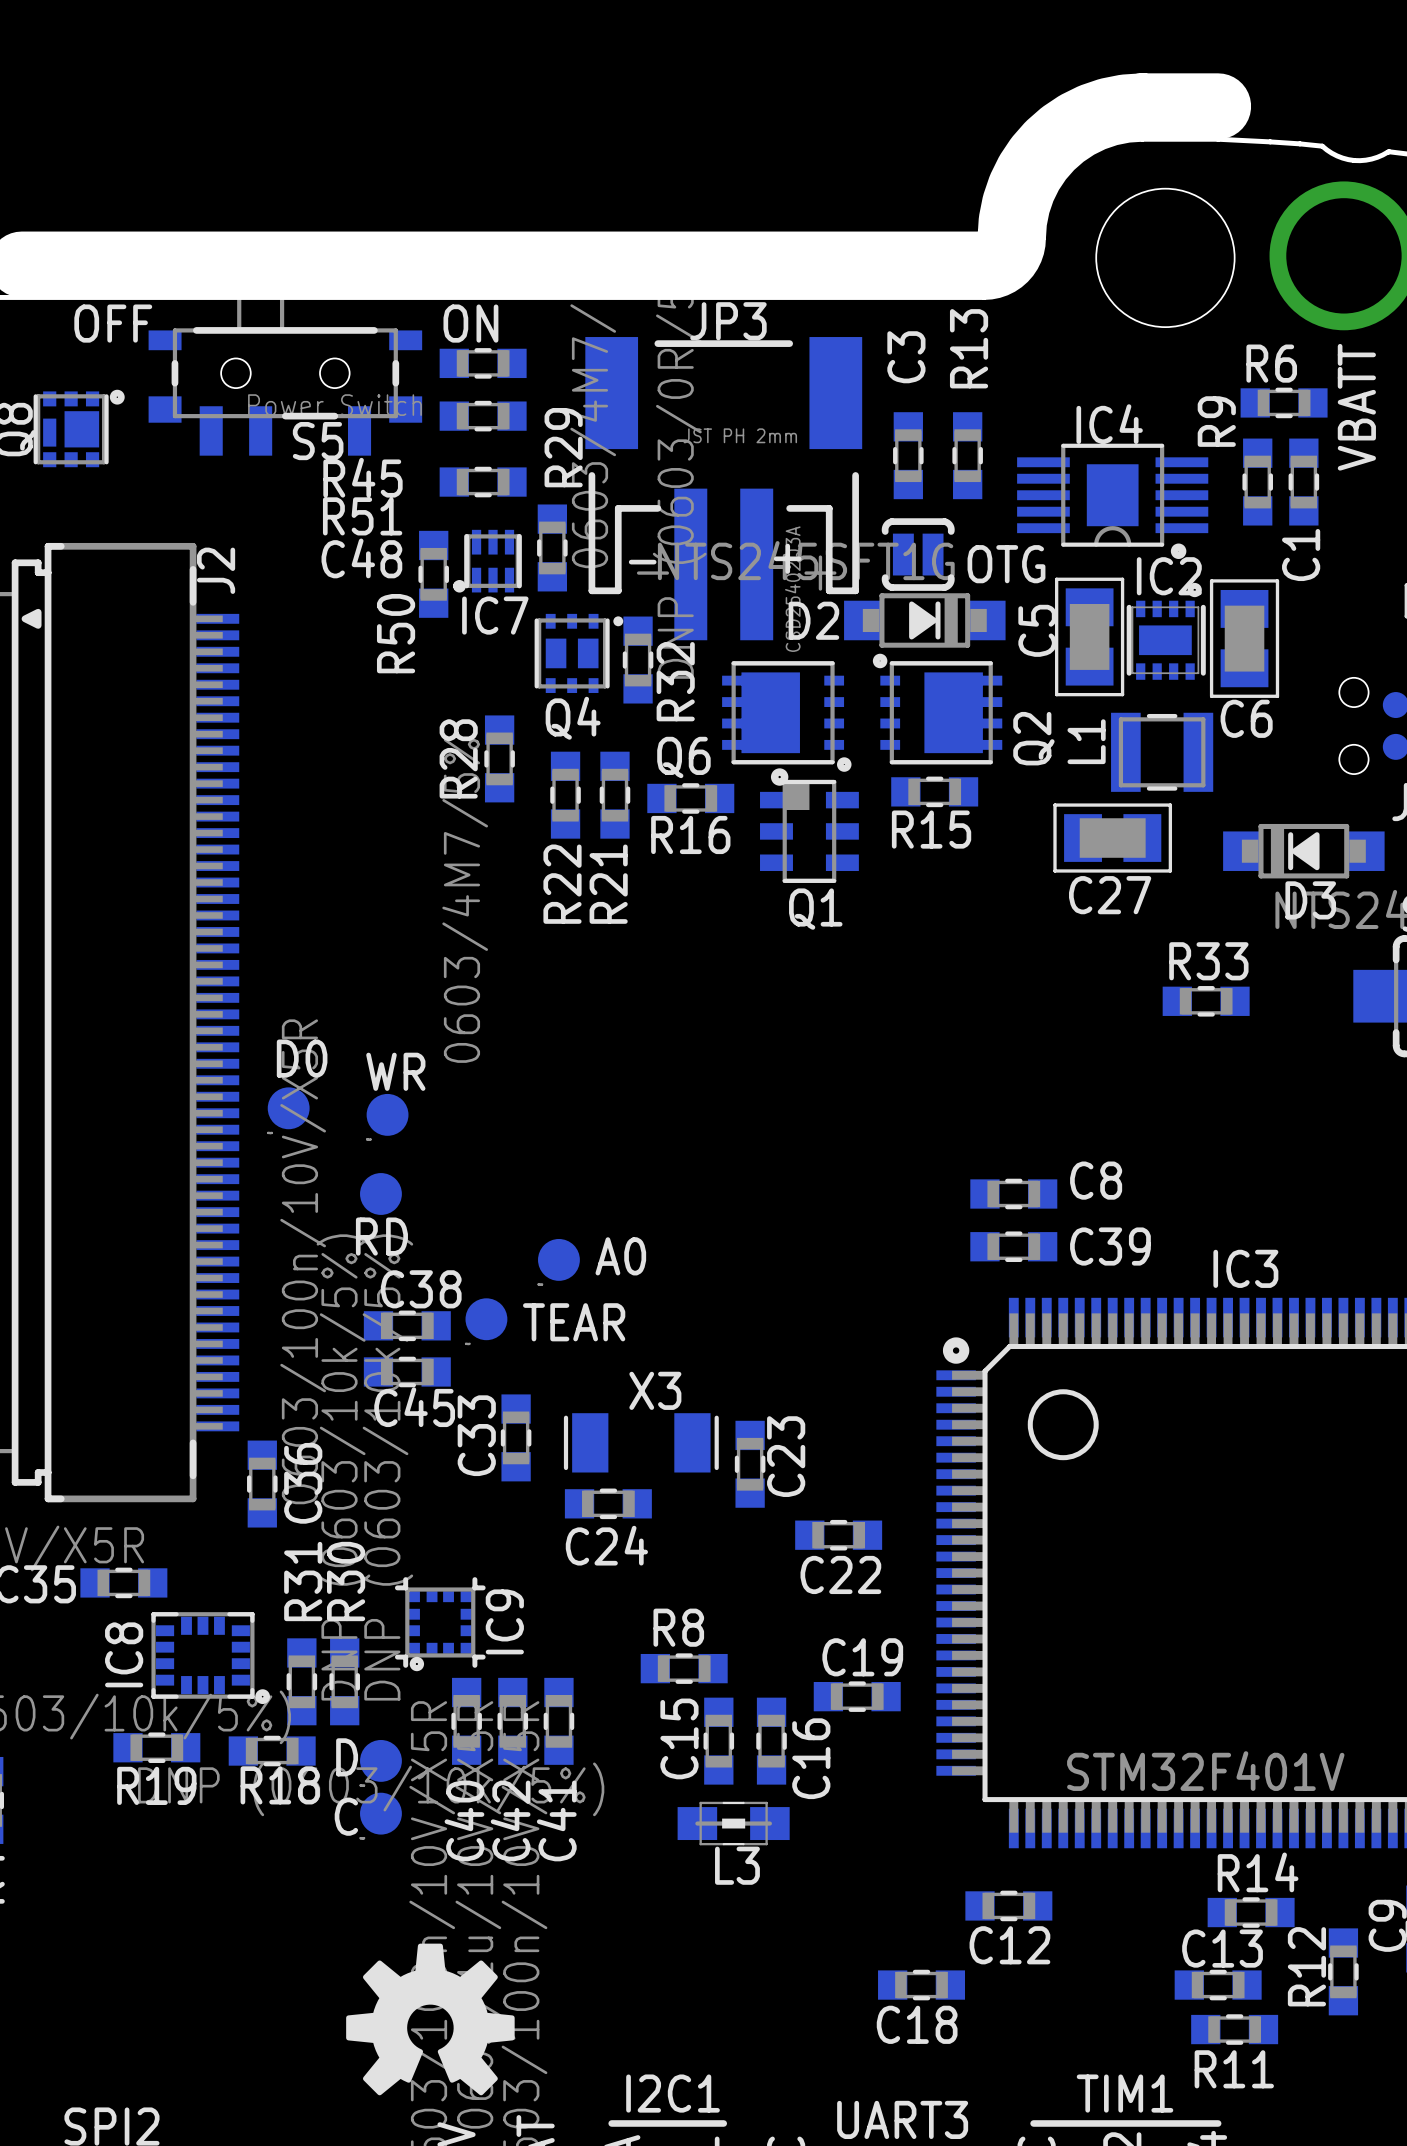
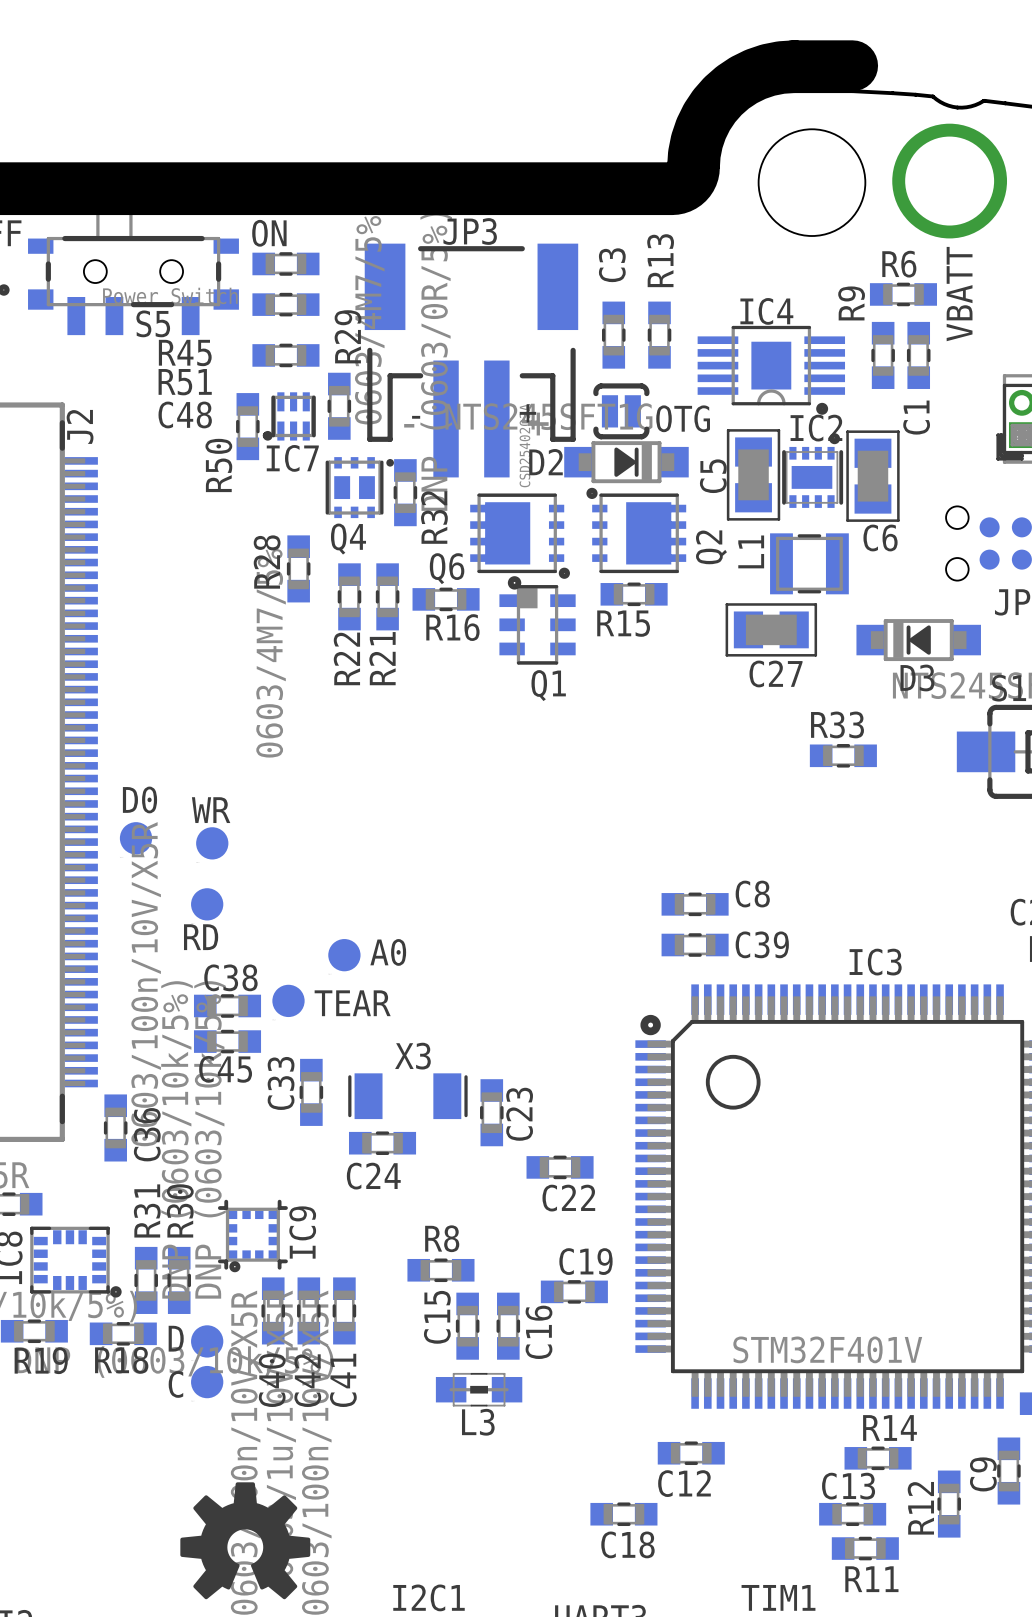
JP3 value: JST PH 2mm (740, 435) -> none

